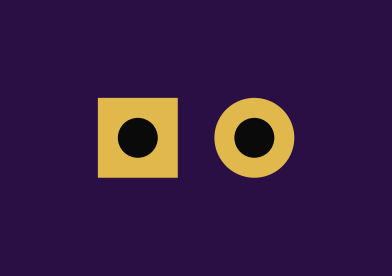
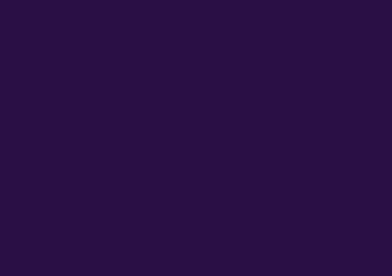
part: (196, 137) -> none

